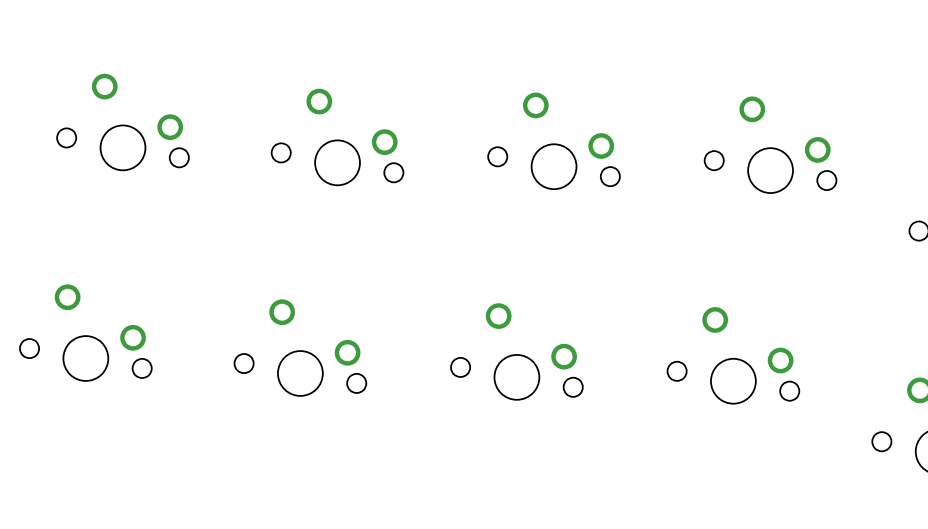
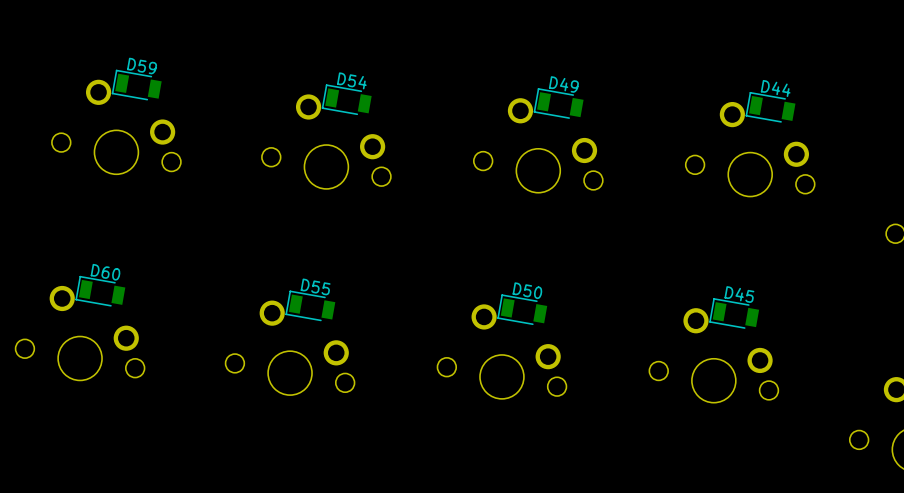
D59: none -> (136, 85)
D54: none -> (346, 99)
D49: none -> (558, 103)
D44: none -> (770, 107)
D60: none -> (100, 291)
D55: none -> (310, 305)
D50: none -> (522, 309)
D45: none -> (734, 313)

